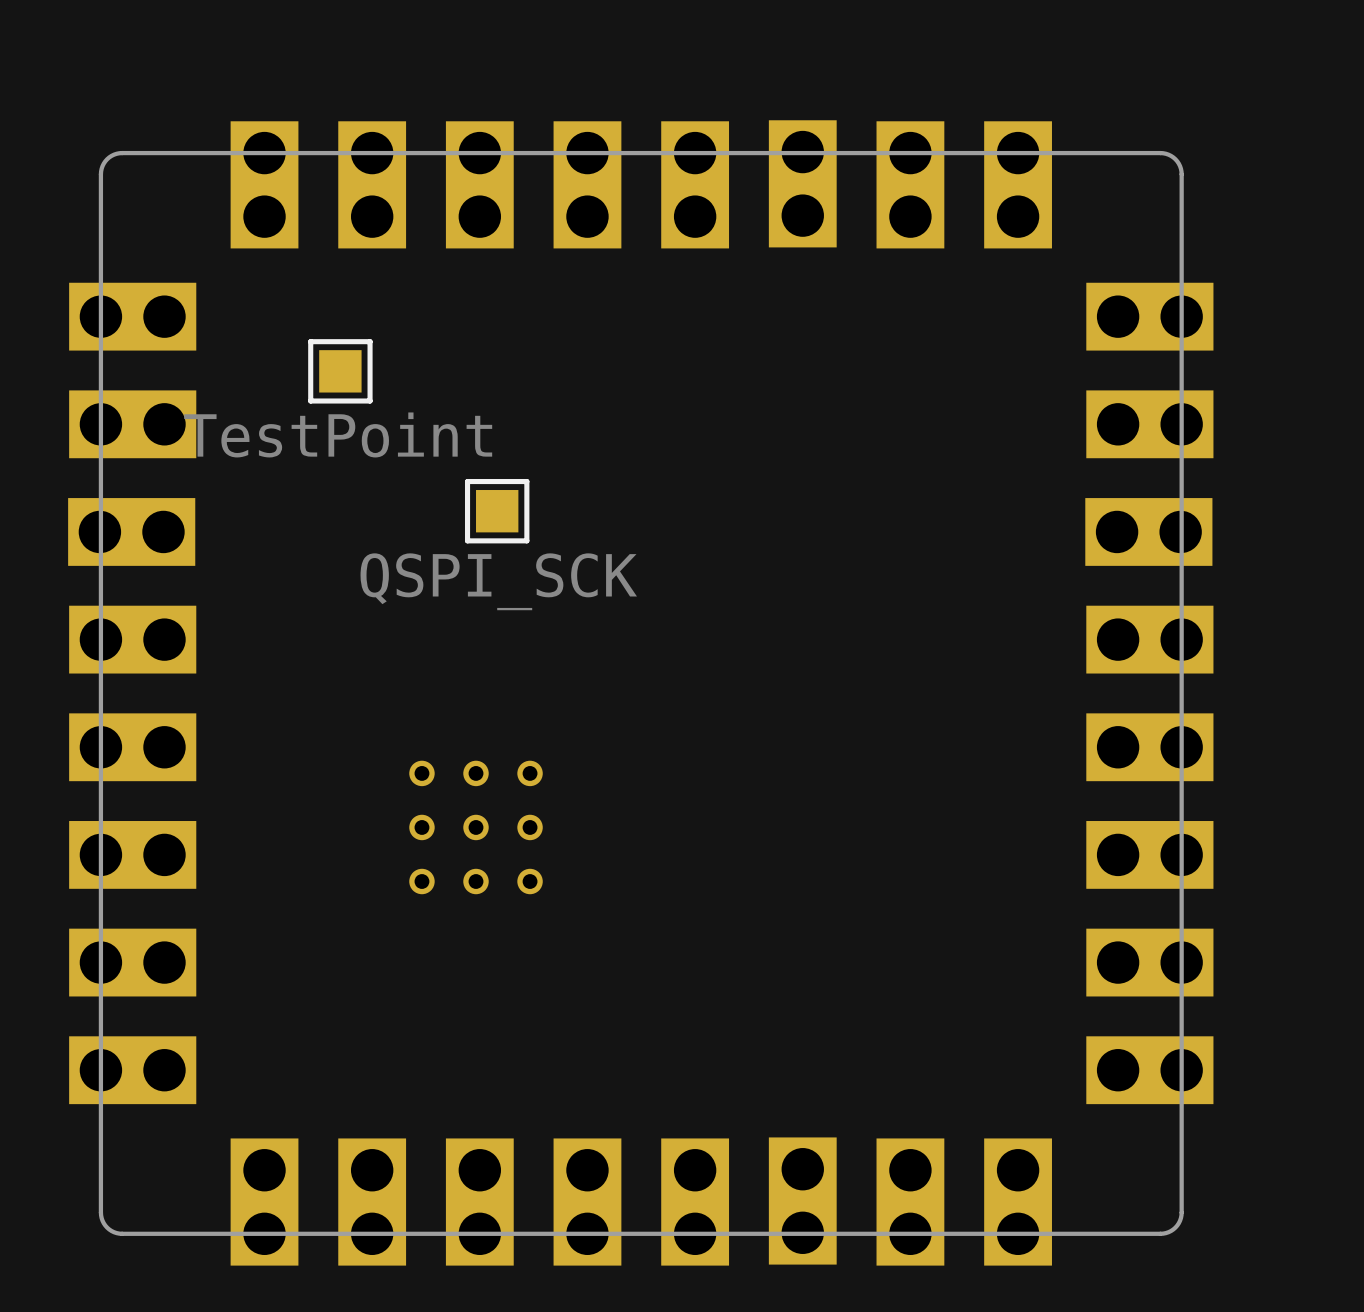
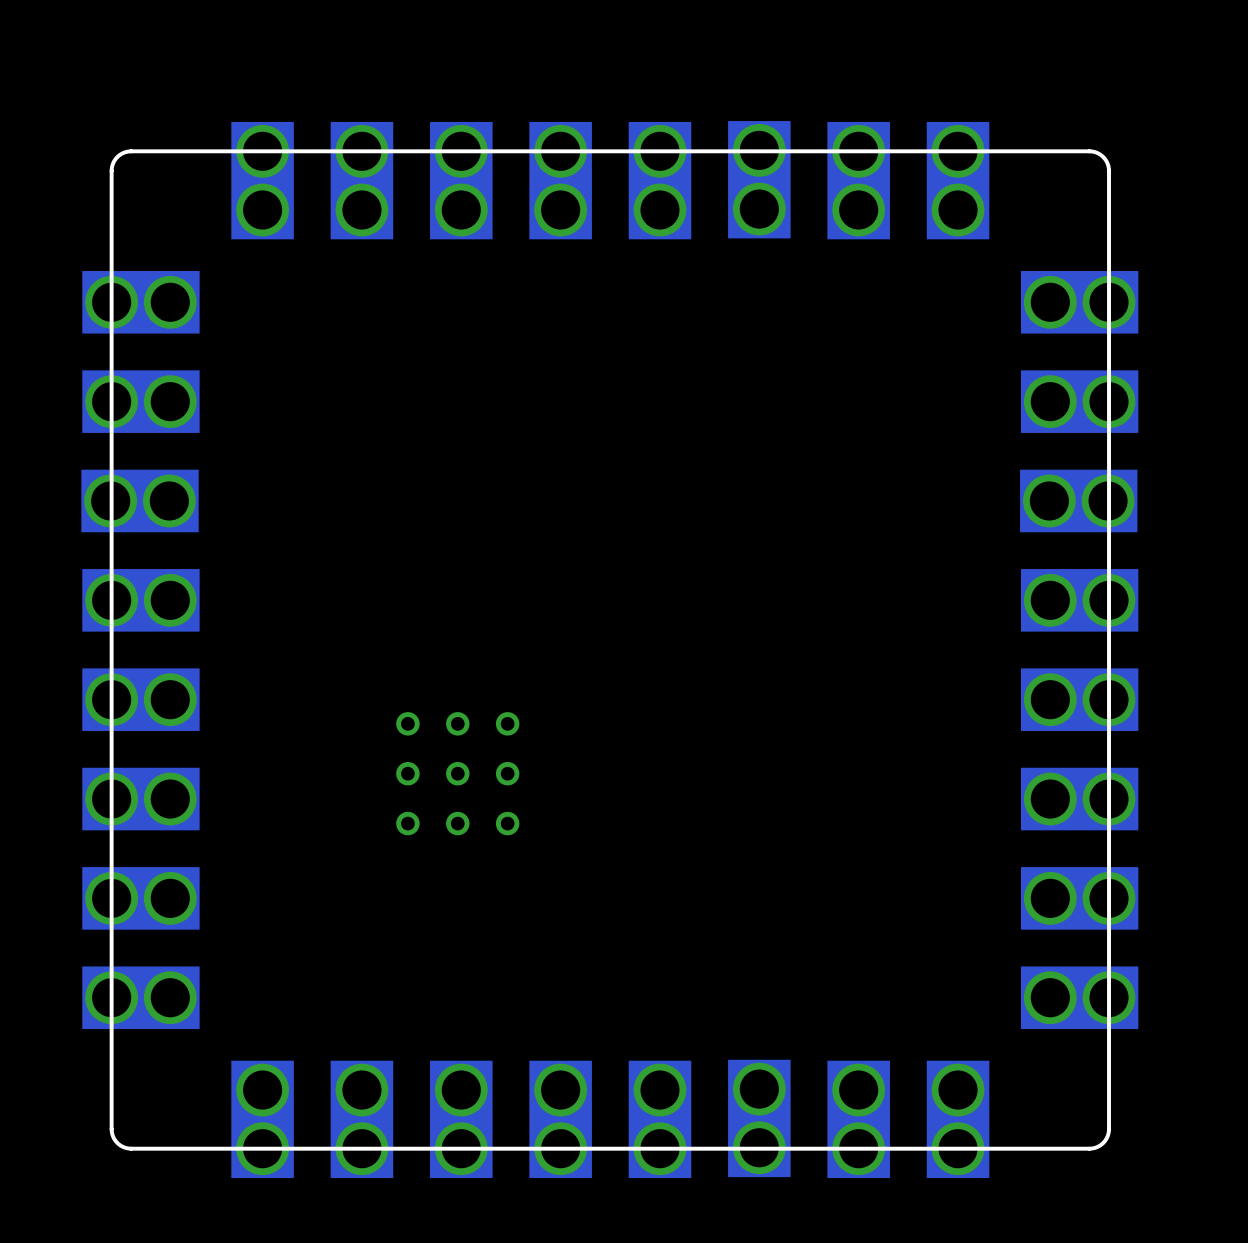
part: TestPoint (340, 371) -> none
part: QSPI_SCK (497, 511) -> none

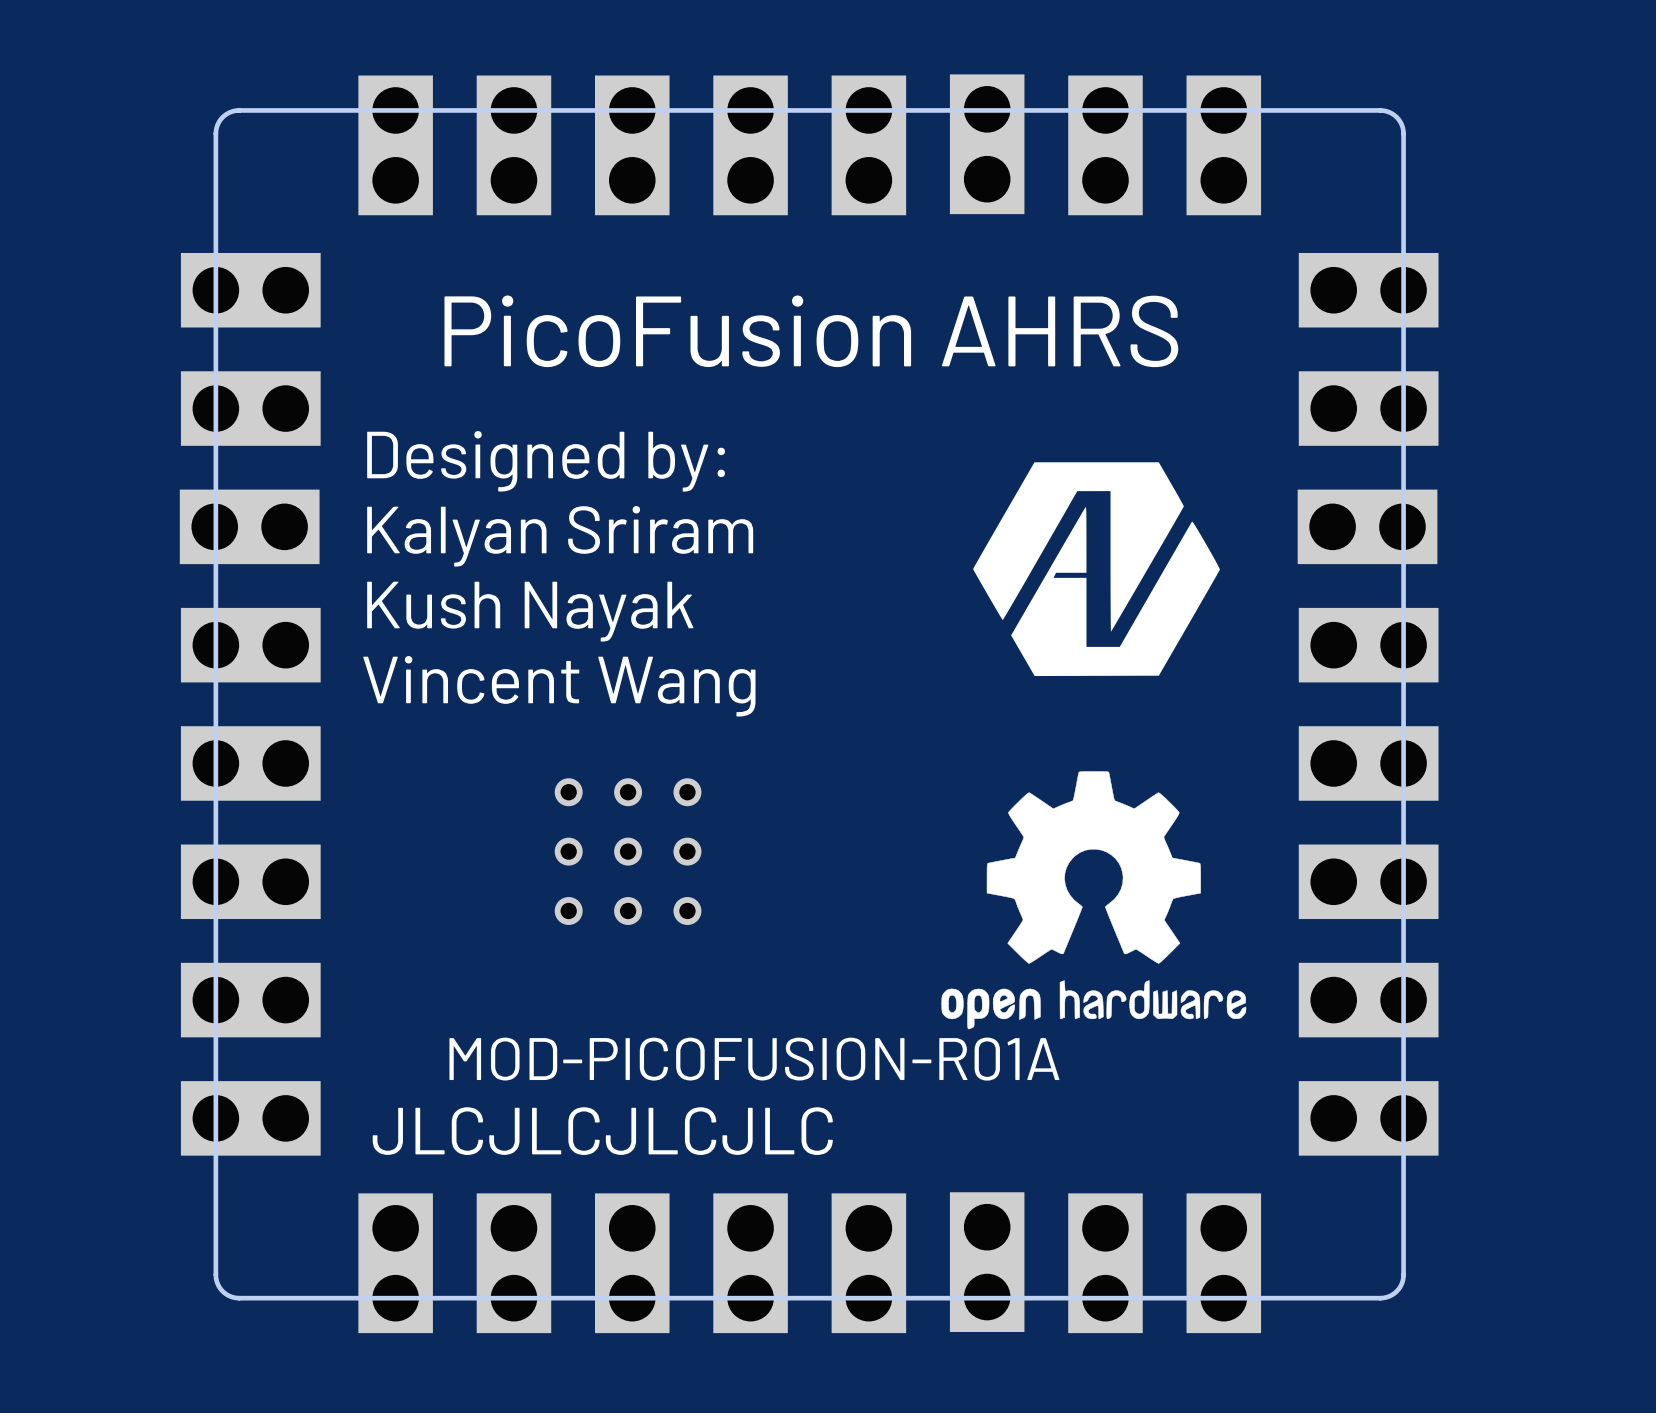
text: none -> PicoFusion AHRS (811, 331)
text: none -> Designed by: (546, 461)
drawing: none -> [973, 462, 1220, 677]
text: none -> Kalyan Sriram (560, 536)
text: none -> Kush Nayak (530, 611)
text: none -> Vincent Wang (559, 686)
drawing: none -> [941, 771, 1247, 1030]
text: none -> MOD-PICOFUSION-R01A (754, 1059)
text: none -> JLCJLCJLCJLC (602, 1131)

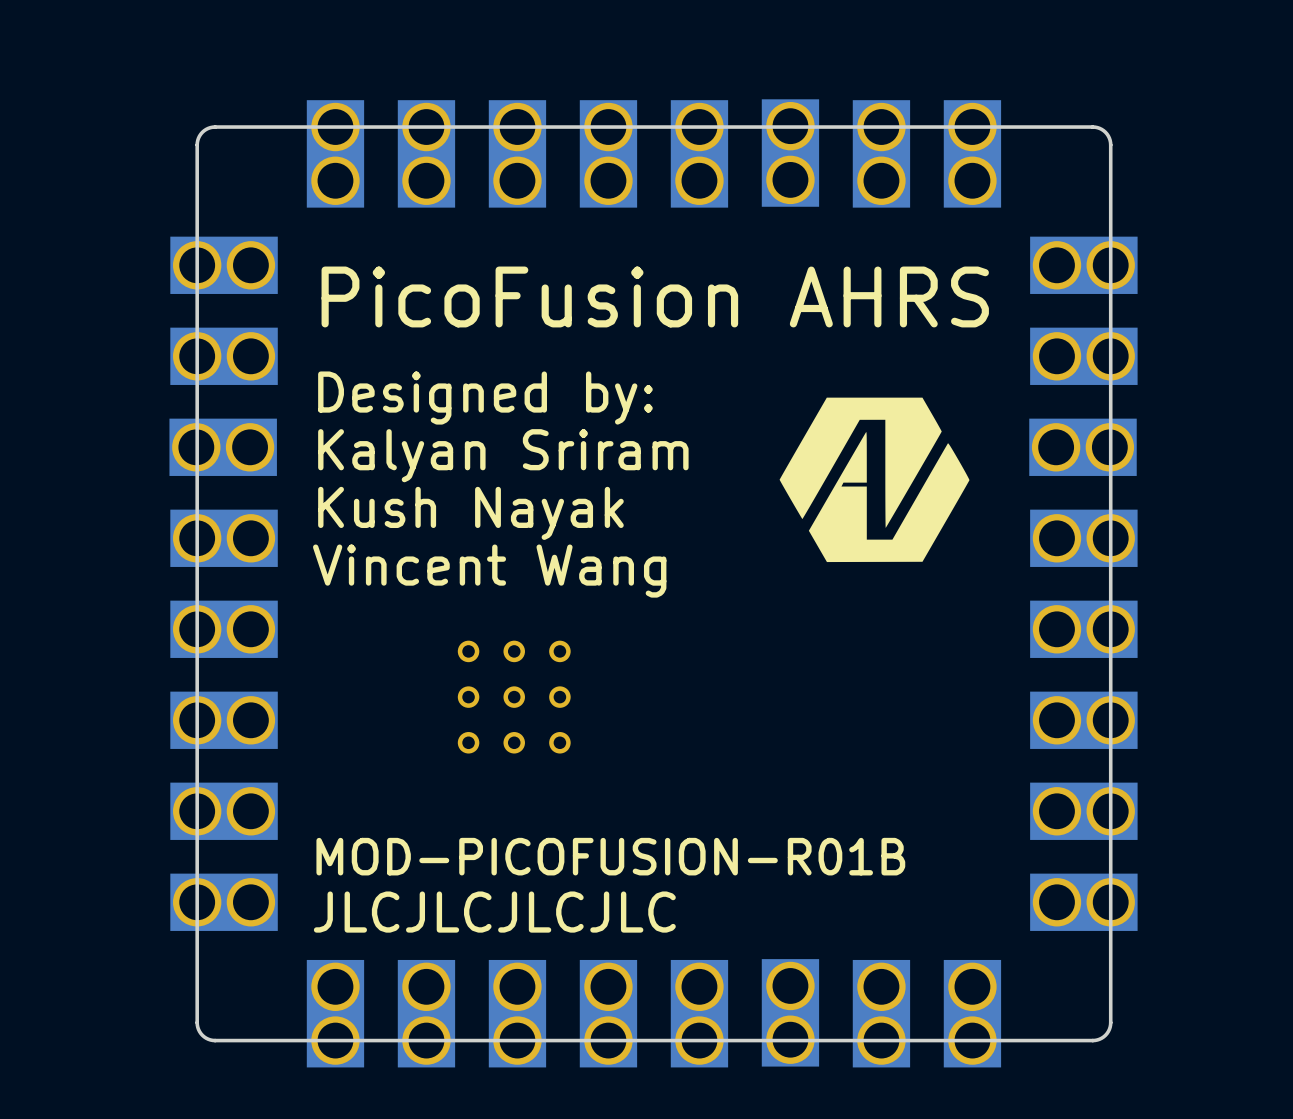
drawing: [941, 771, 1247, 1030] -> none
text: MOD-PICOFUSION-R01A (754, 1059) -> MOD-PICOFUSION-R01B (610, 856)

